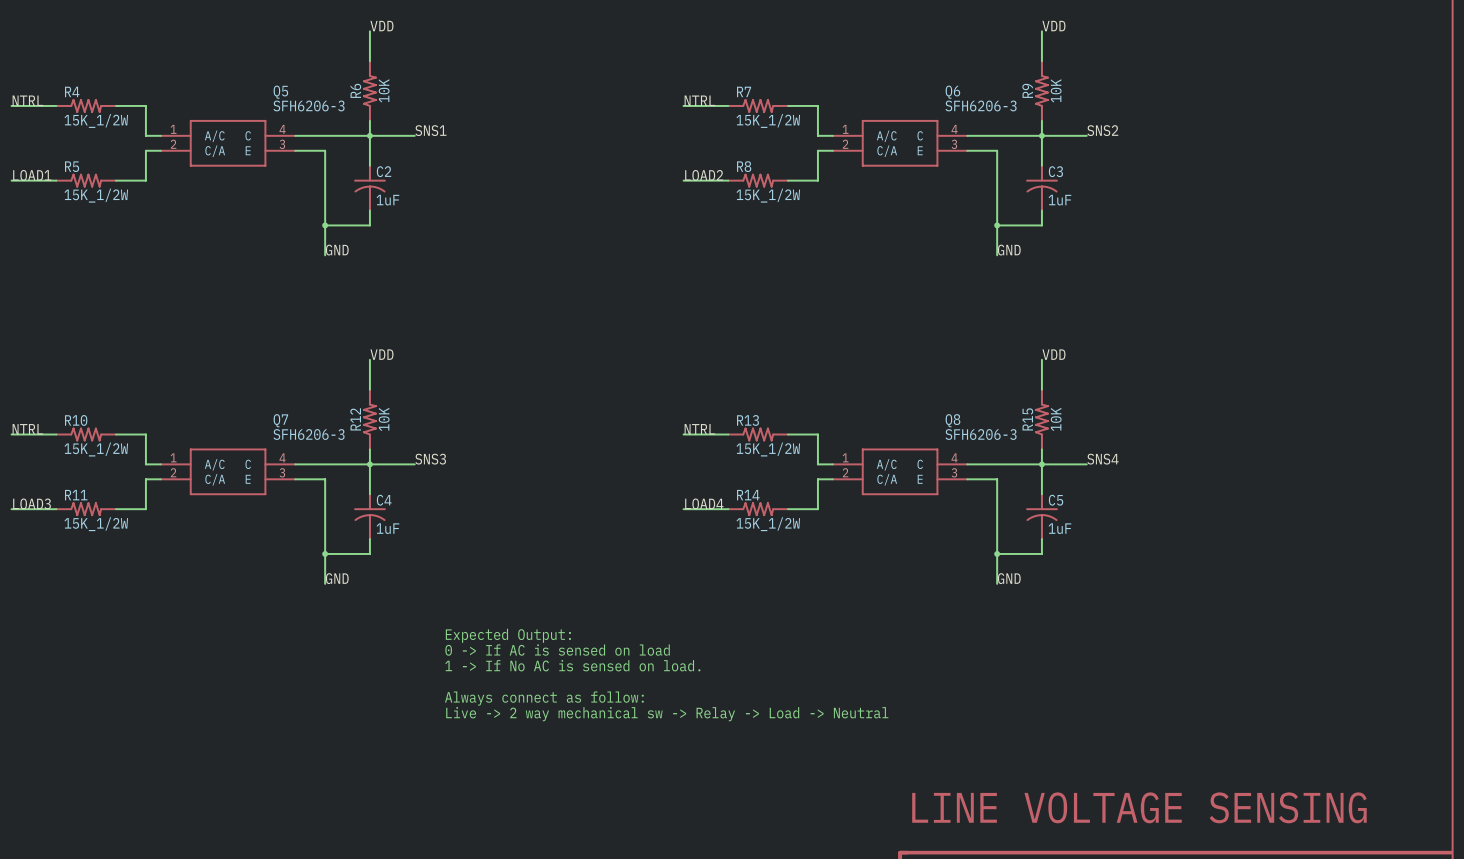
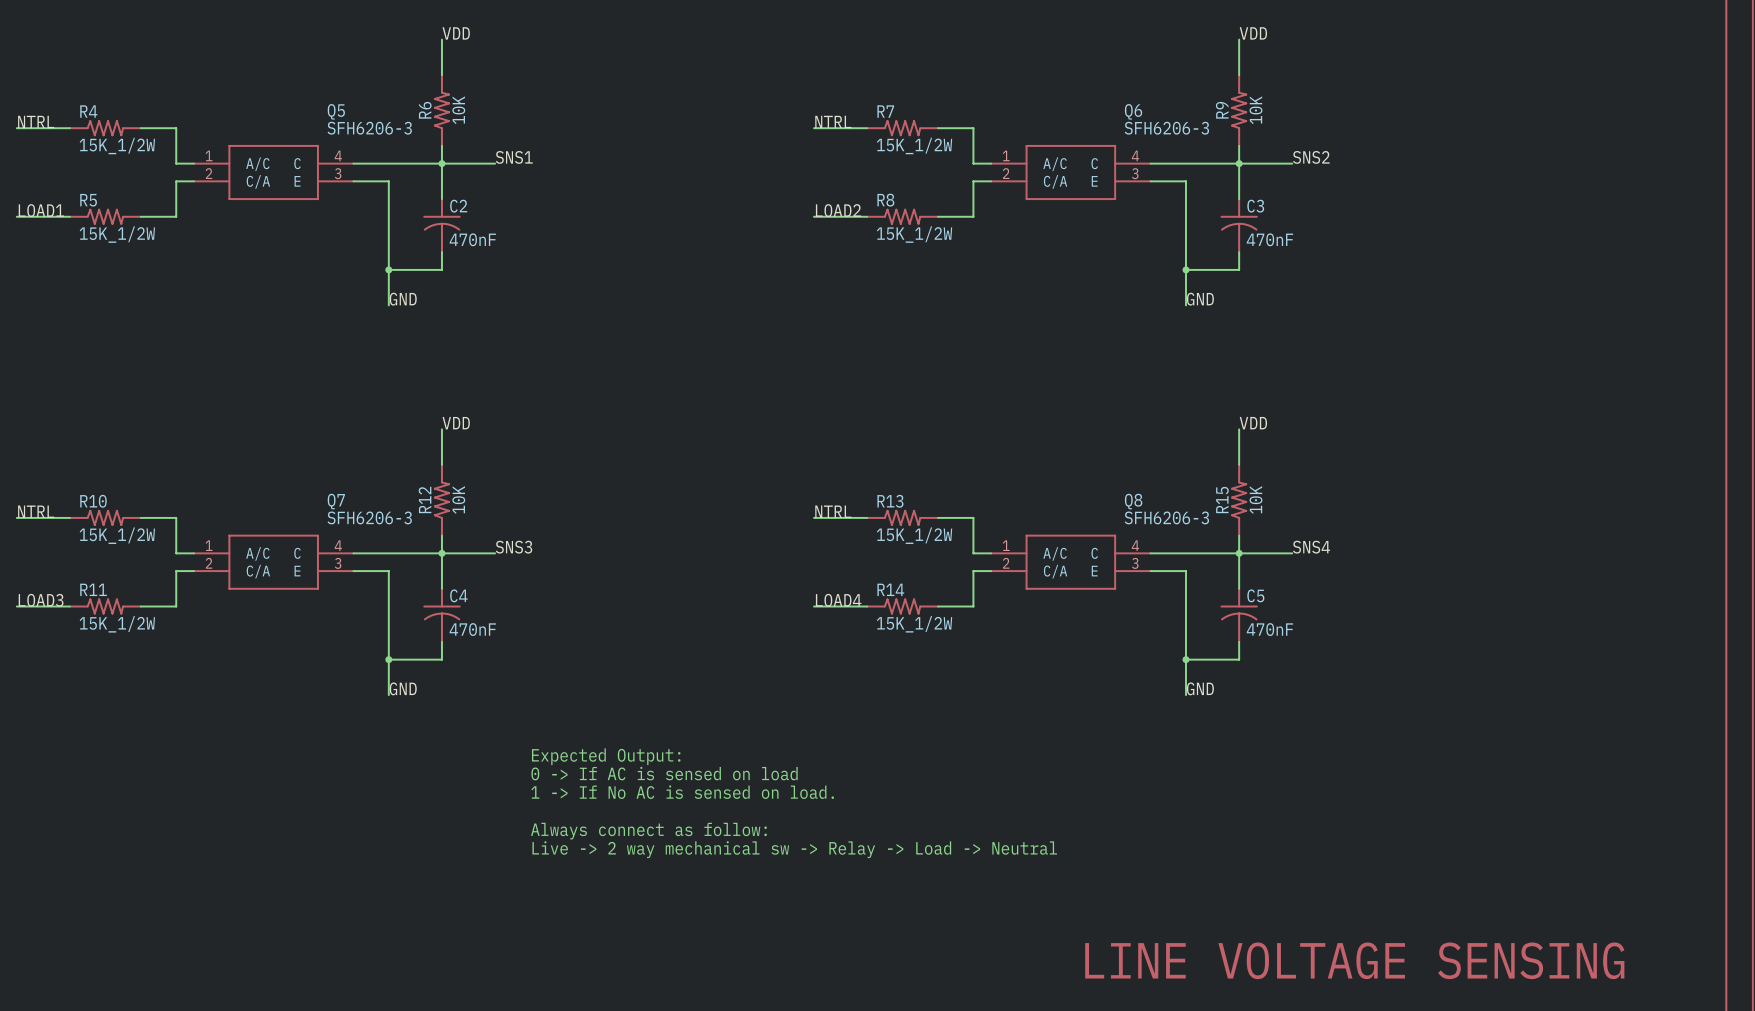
C2 value: 1uF (387, 200) -> 470nF (472, 239)
C3 value: 1uF (1059, 200) -> 470nF (1269, 239)
C4 value: 1uF (387, 528) -> 470nF (472, 629)
C5 value: 1uF (1059, 528) -> 470nF (1269, 629)

